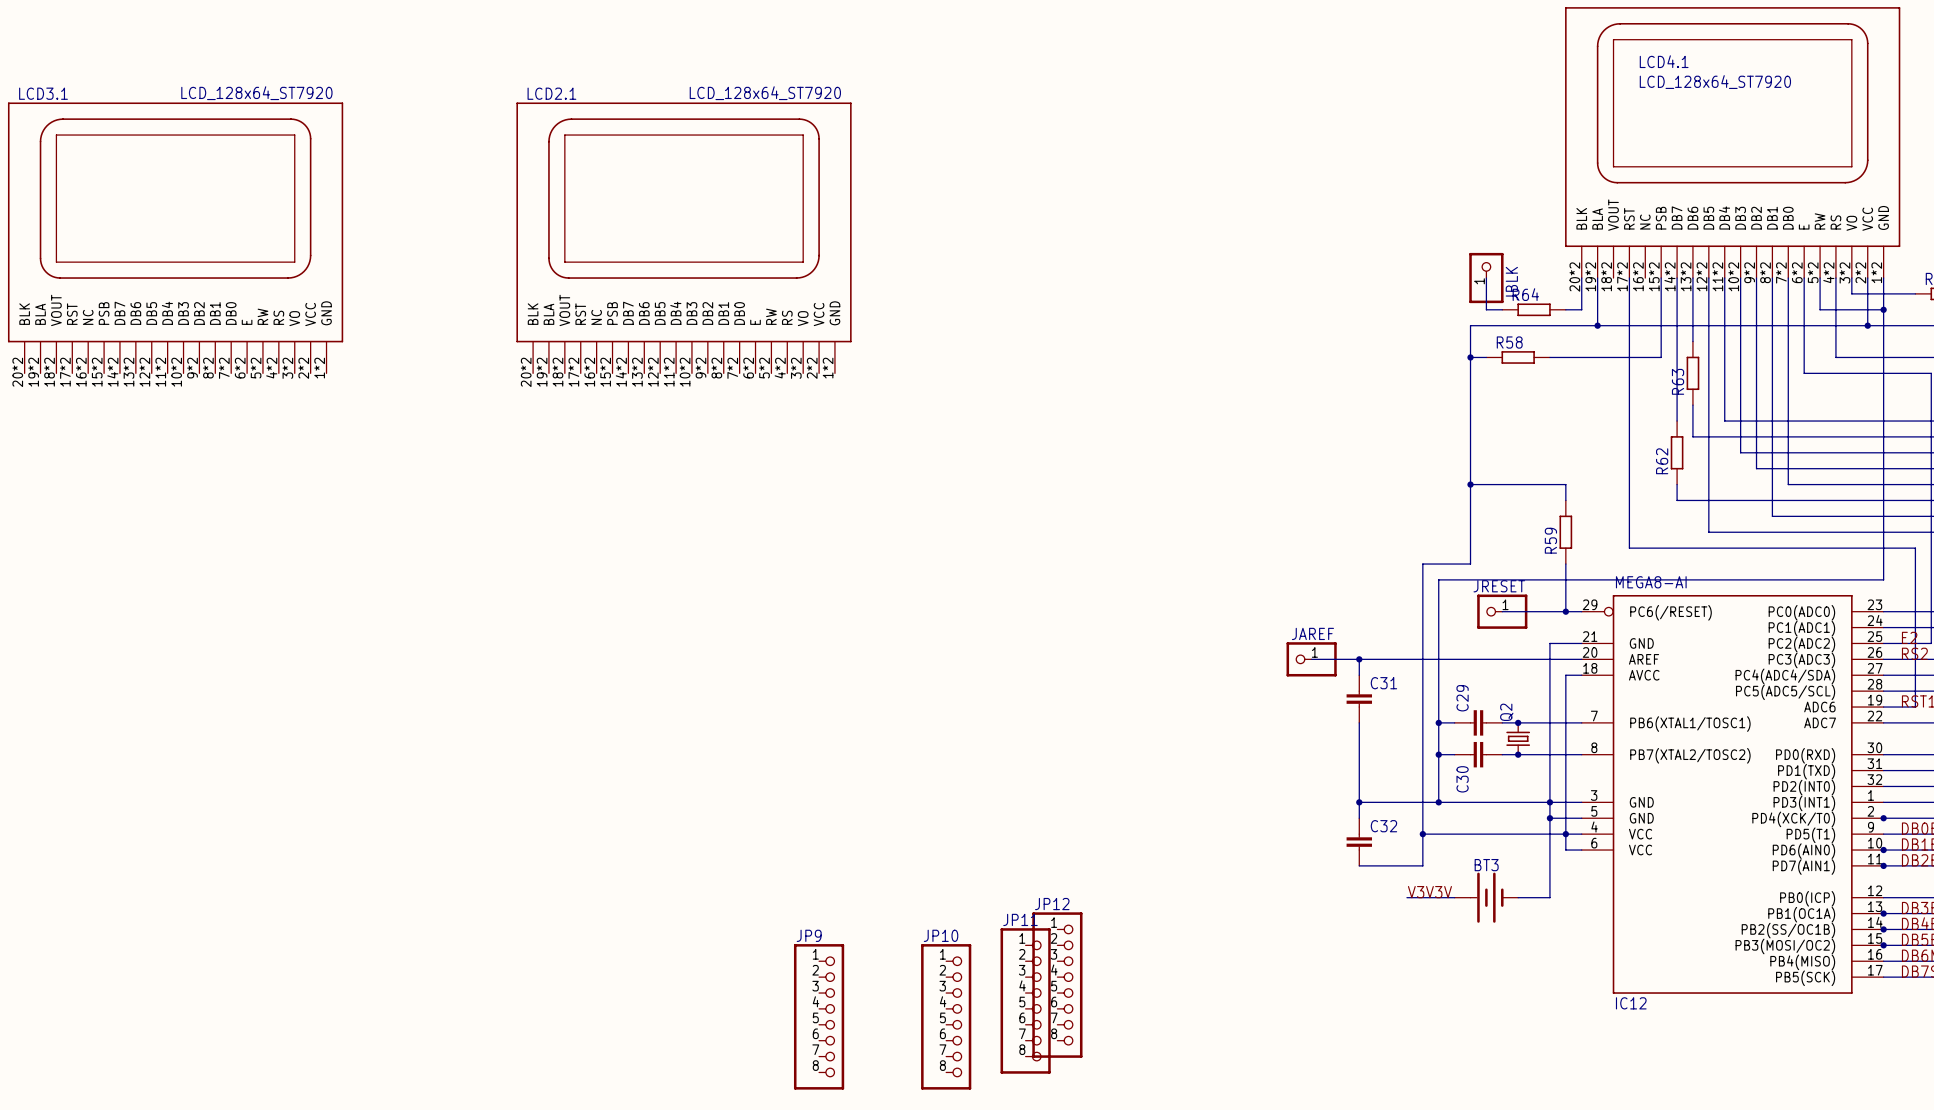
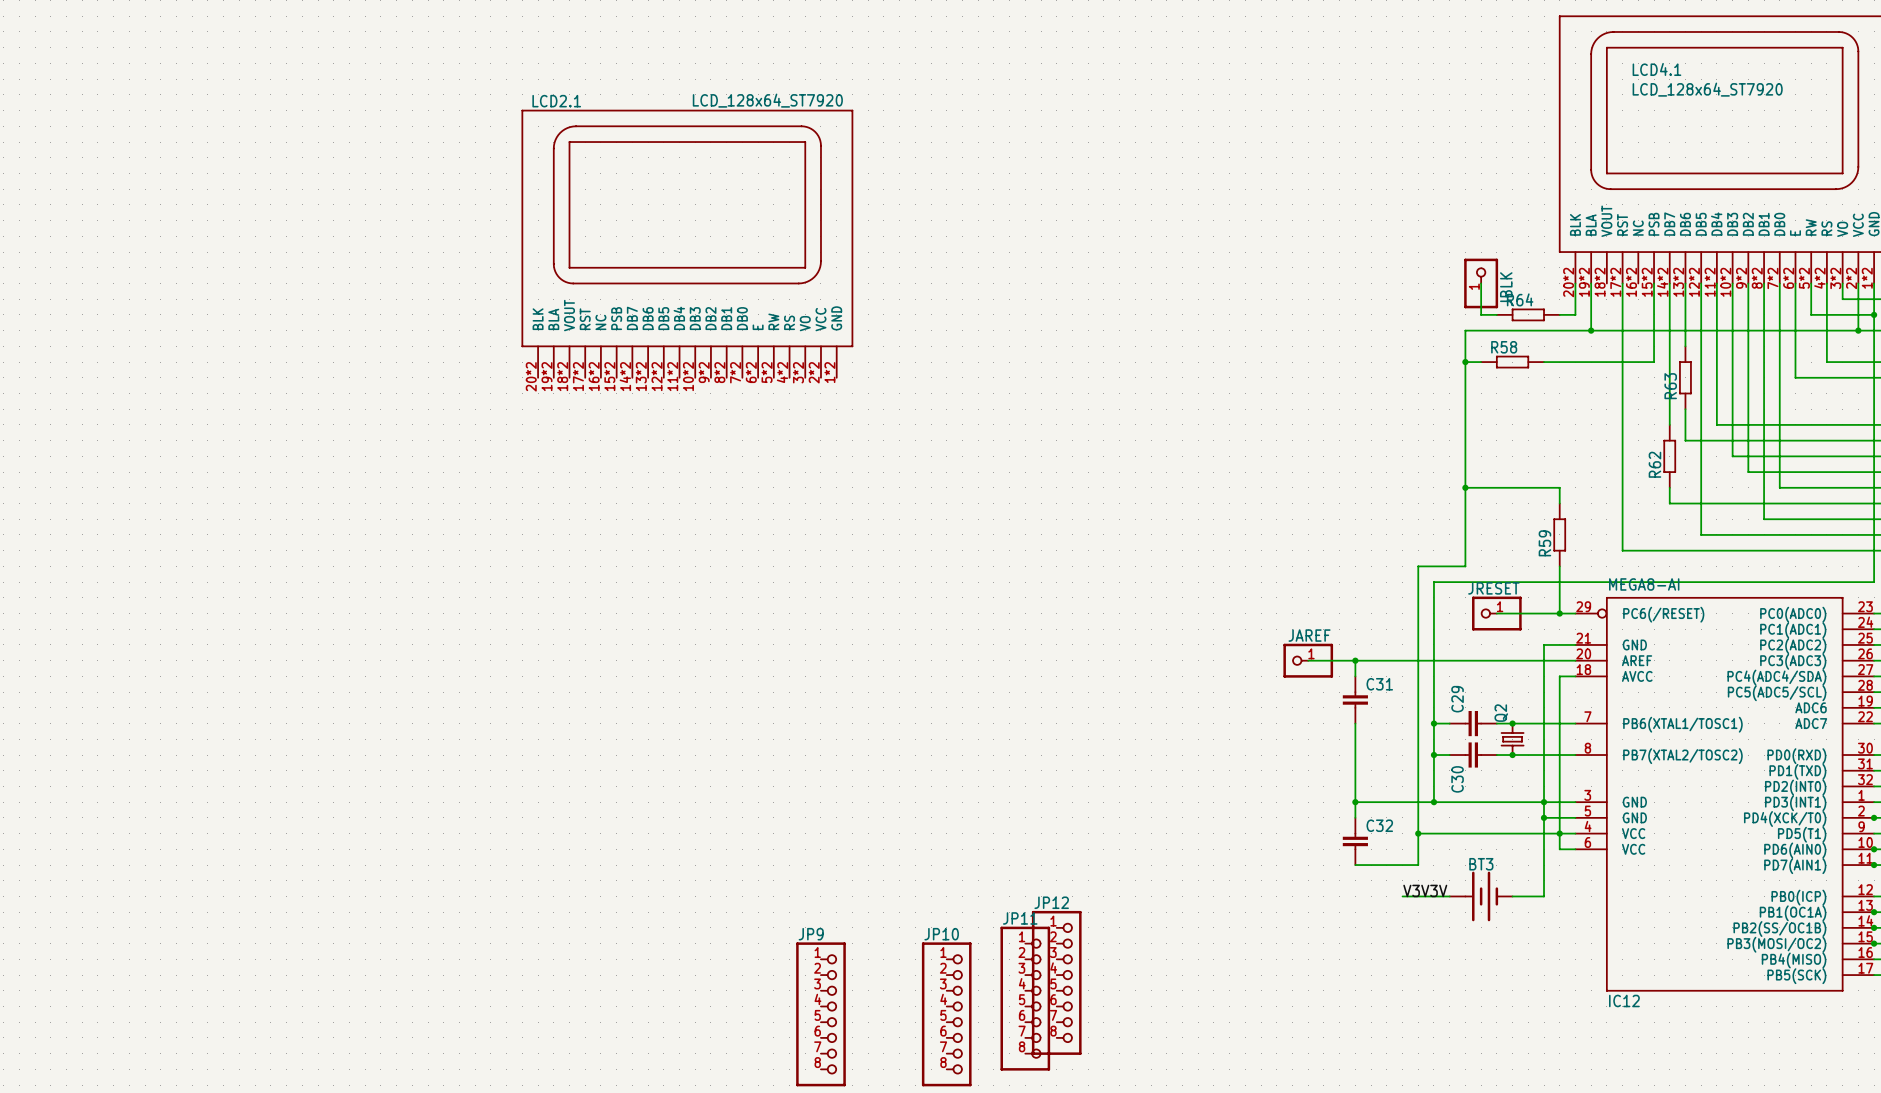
LCD3.1: LCD_128x64_ST7920 (175, 237) -> none

